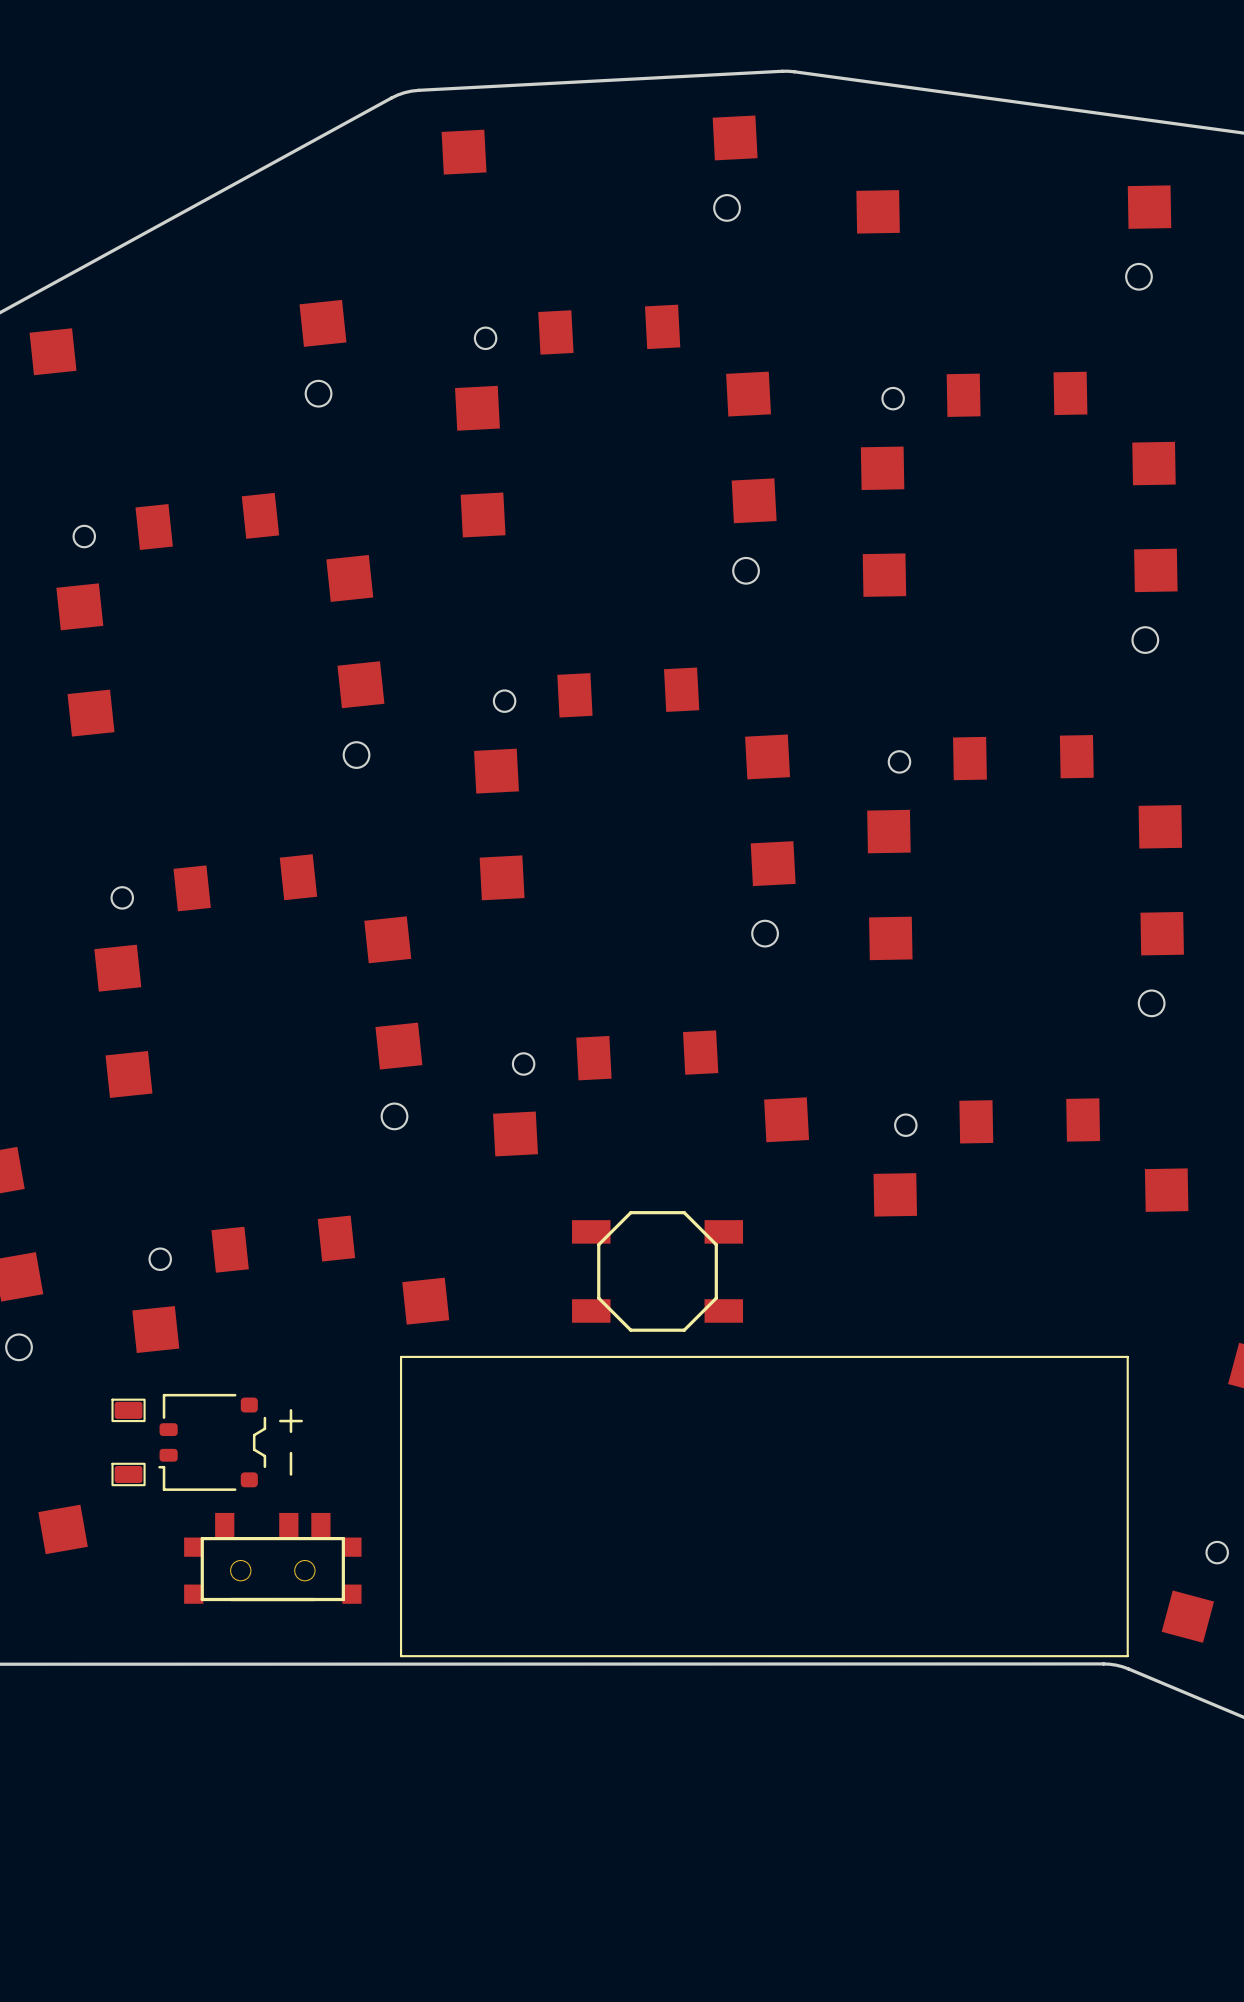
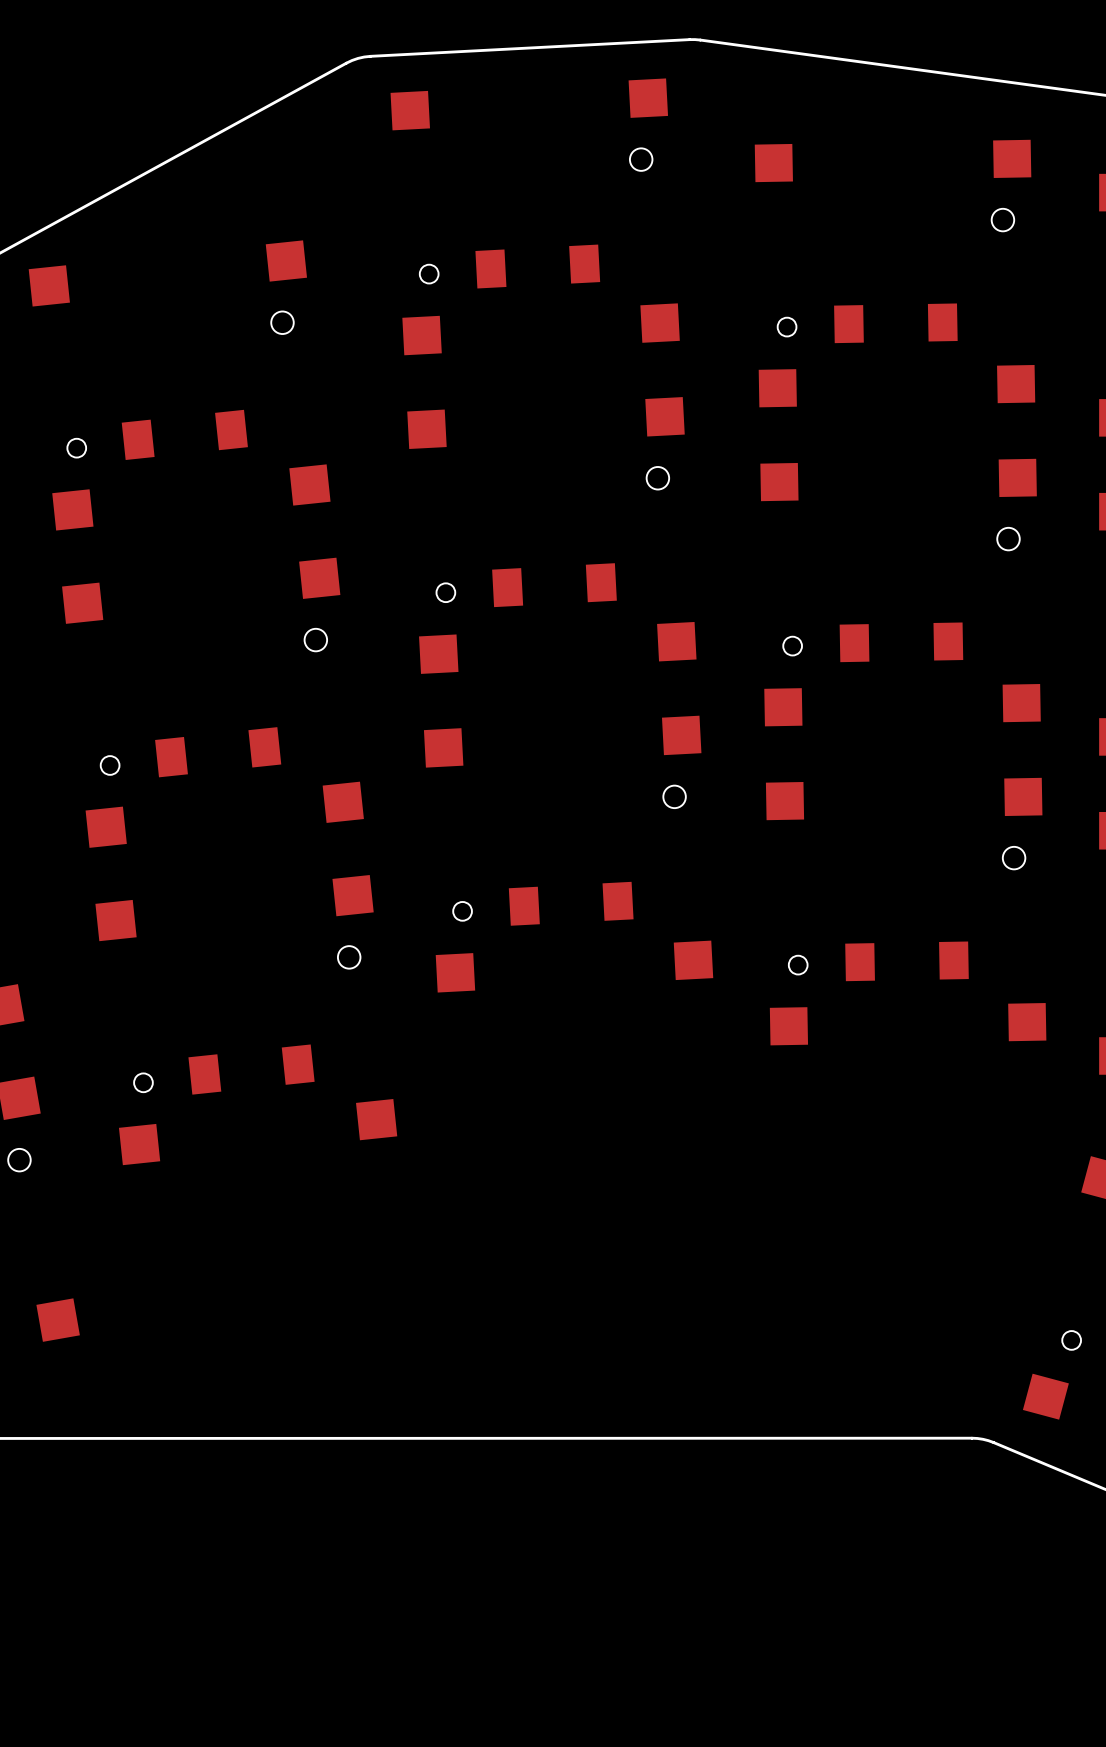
part: (657, 1271) -> none
drawing: [399, 1355, 1129, 1658] -> none
part: (128, 1410) -> none
part: (230, 1442) -> none
part: (128, 1474) -> none
part: (272, 1558) -> none

